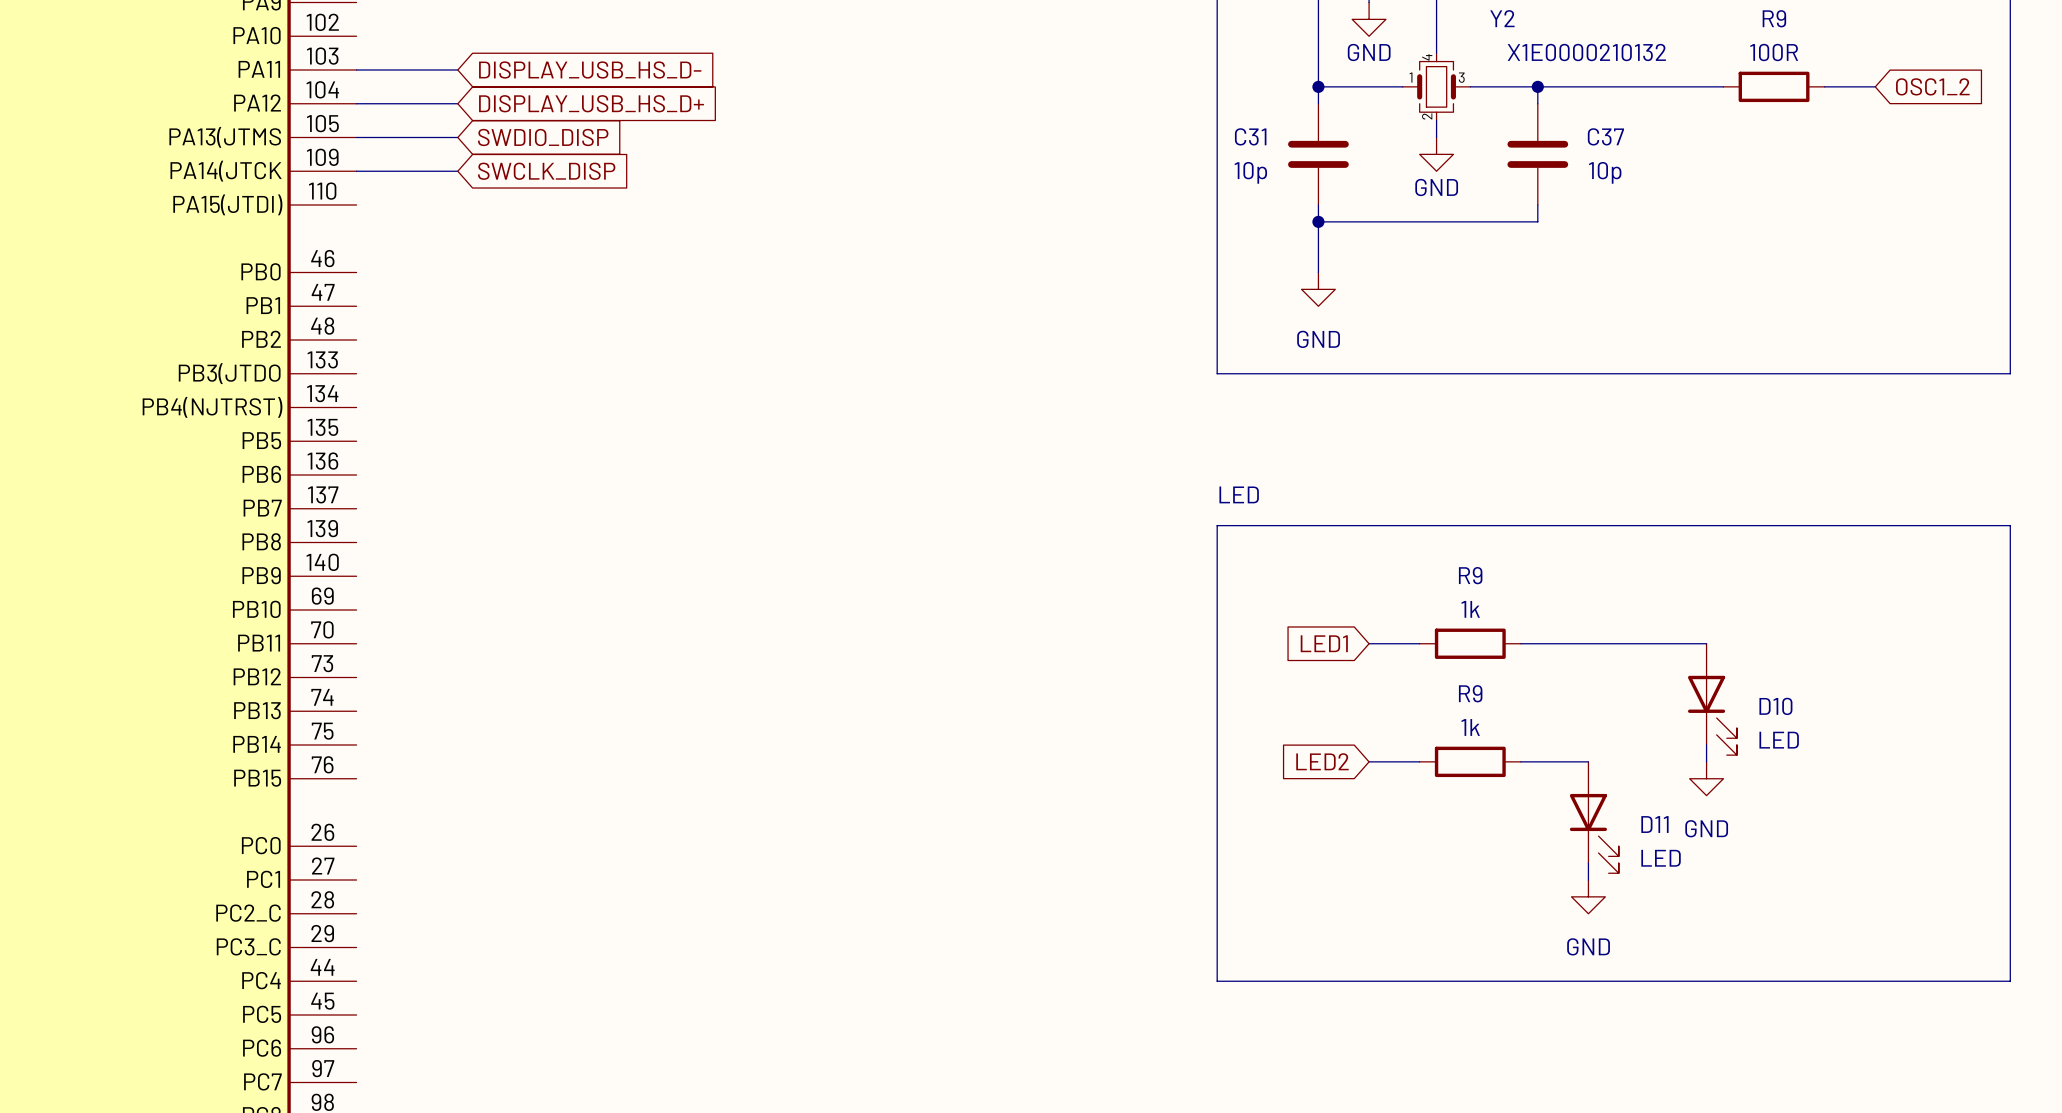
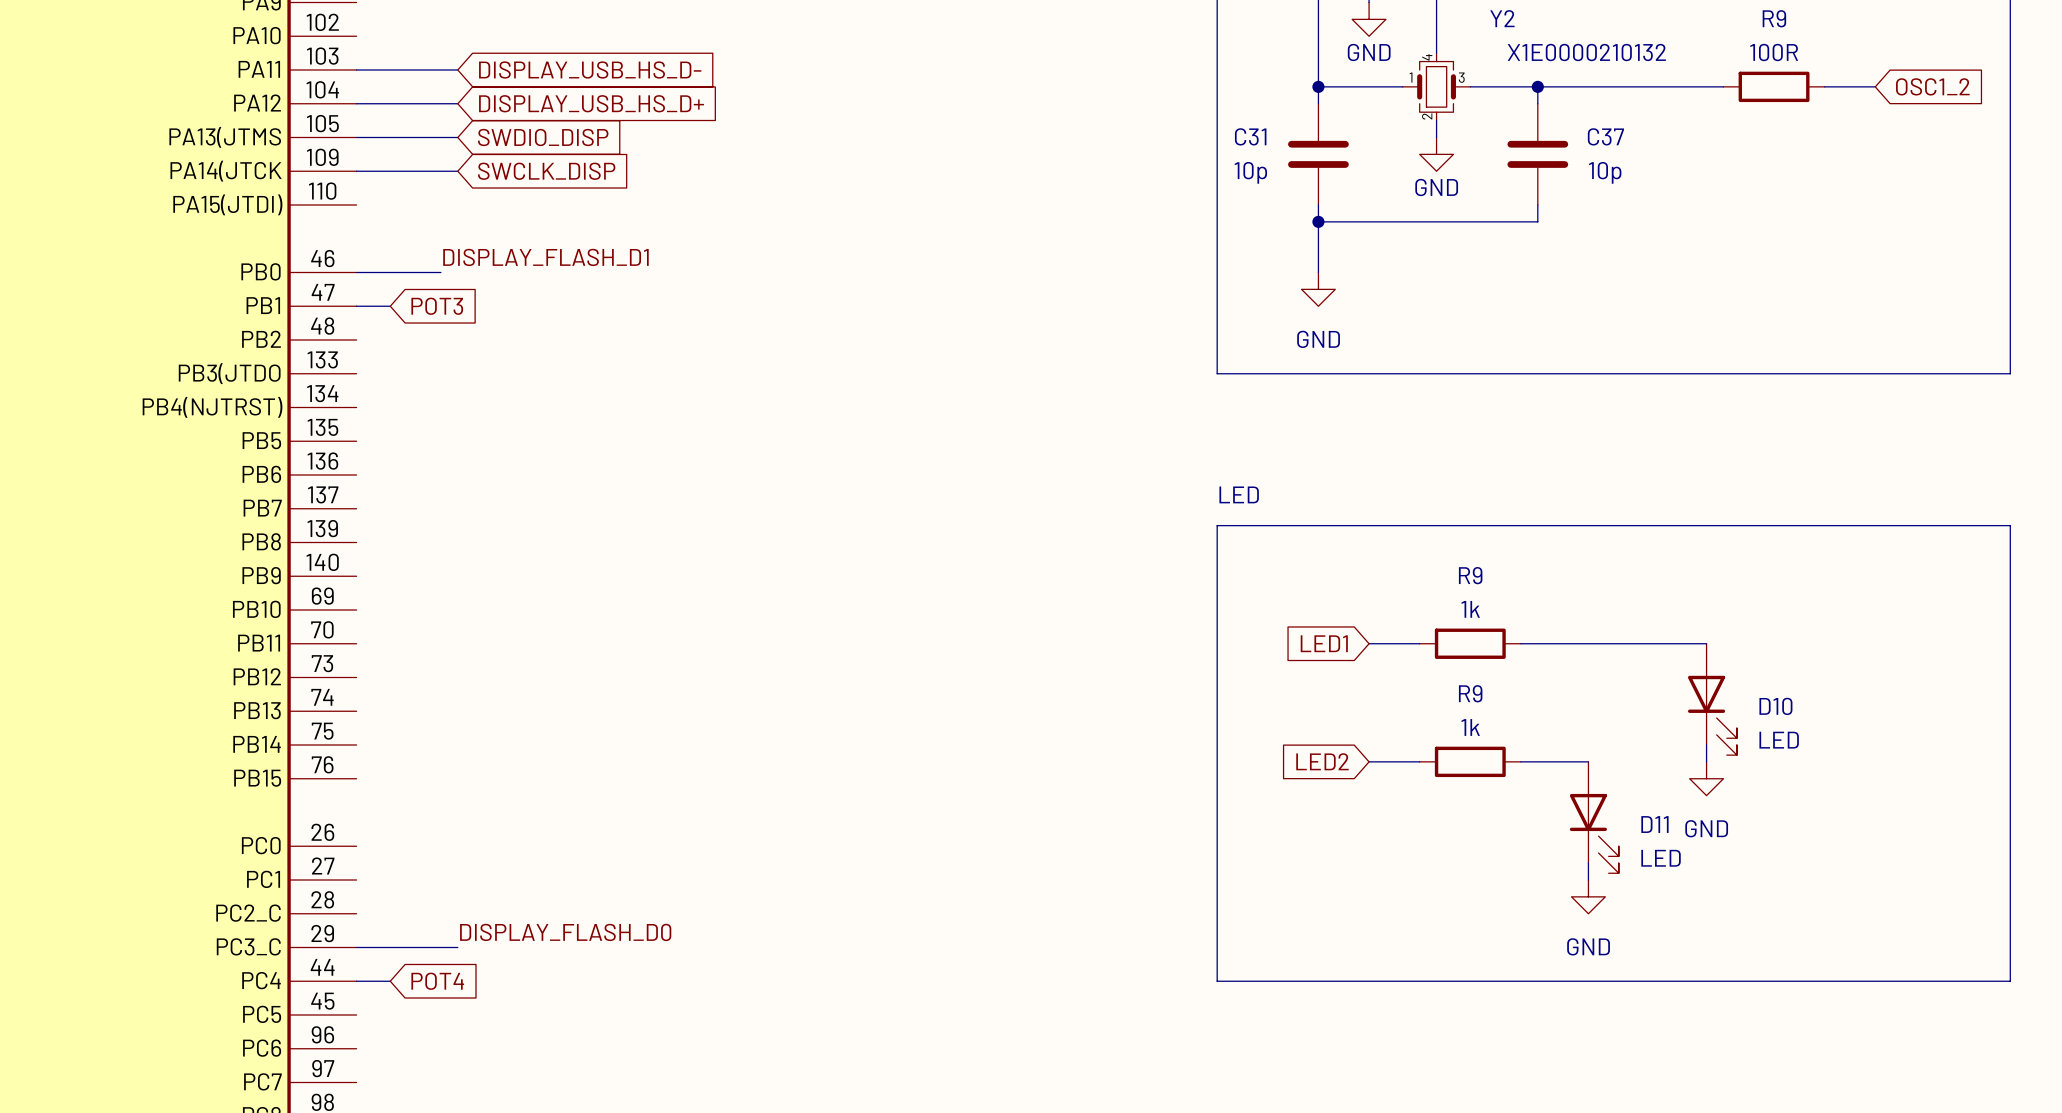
label: none -> DISPLAY_FLASH_D1 (545, 257)
wire: none -> (356, 272) (440, 272)
wire: none -> (356, 306) (390, 306)
global label: none -> POT3 (437, 306)
label: none -> DISPLAY_FLASH_D0 (565, 932)
wire: none -> (356, 947) (457, 947)
wire: none -> (356, 981) (390, 981)
global label: none -> POT4 (437, 981)

